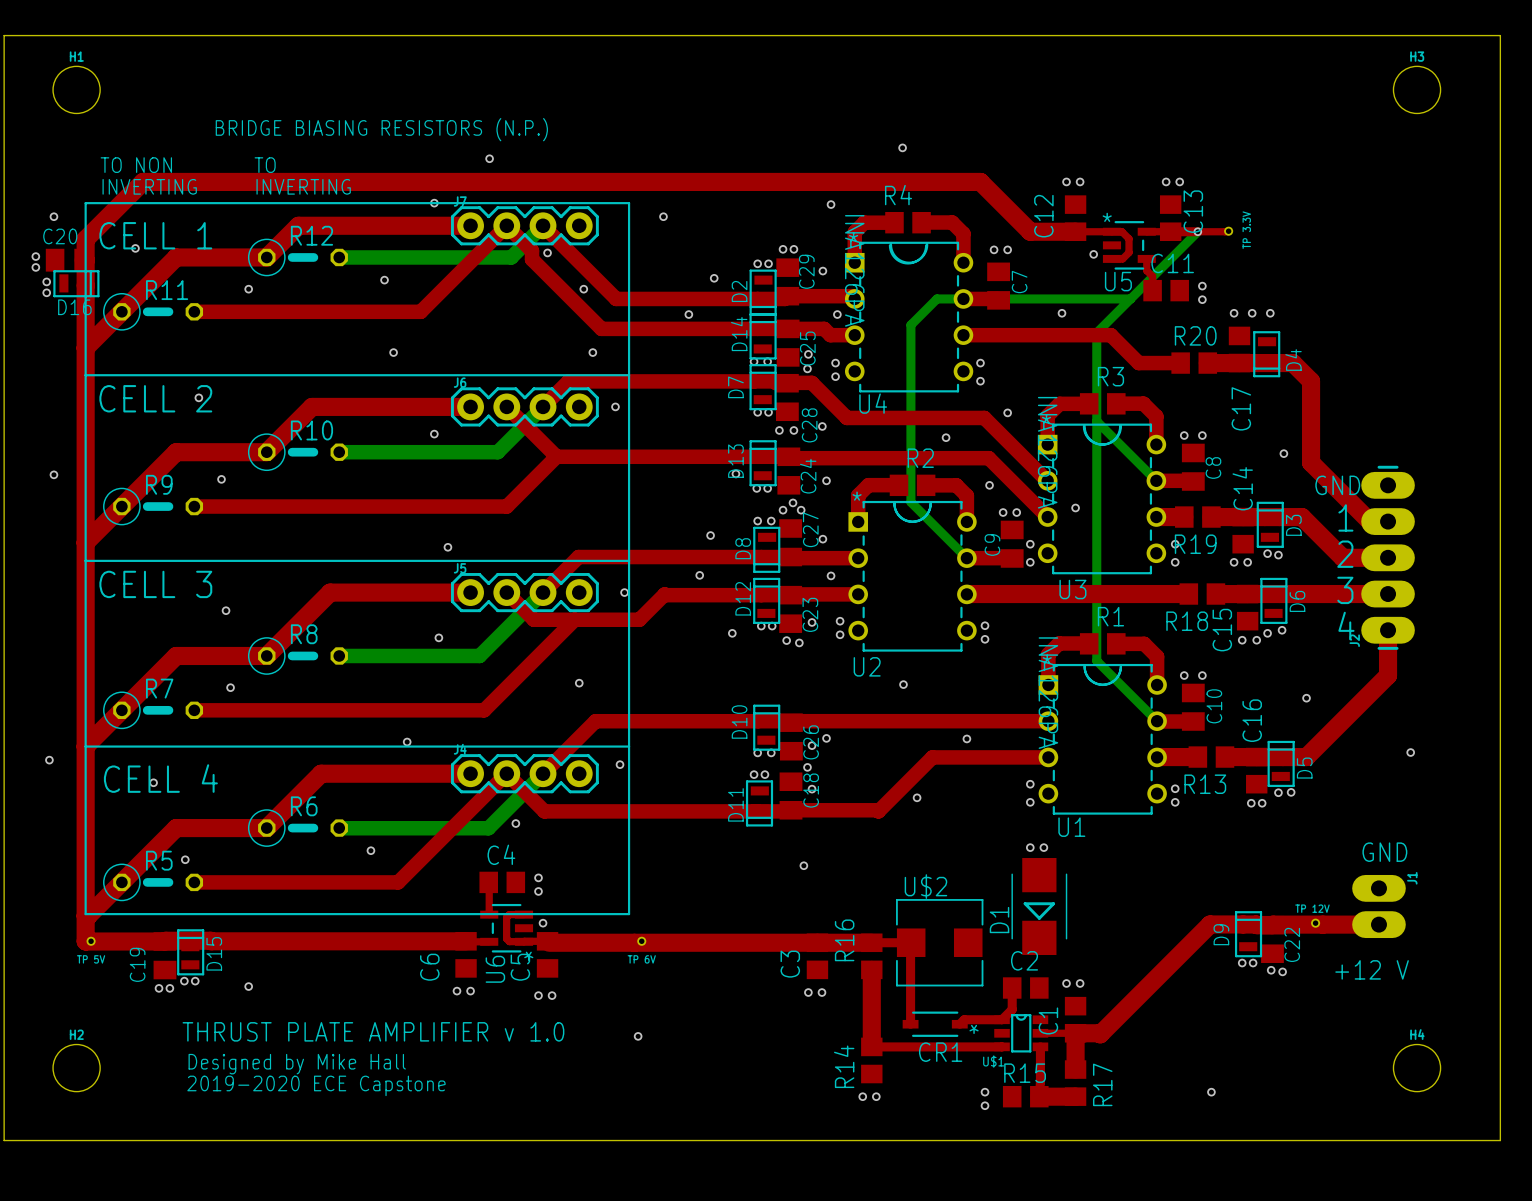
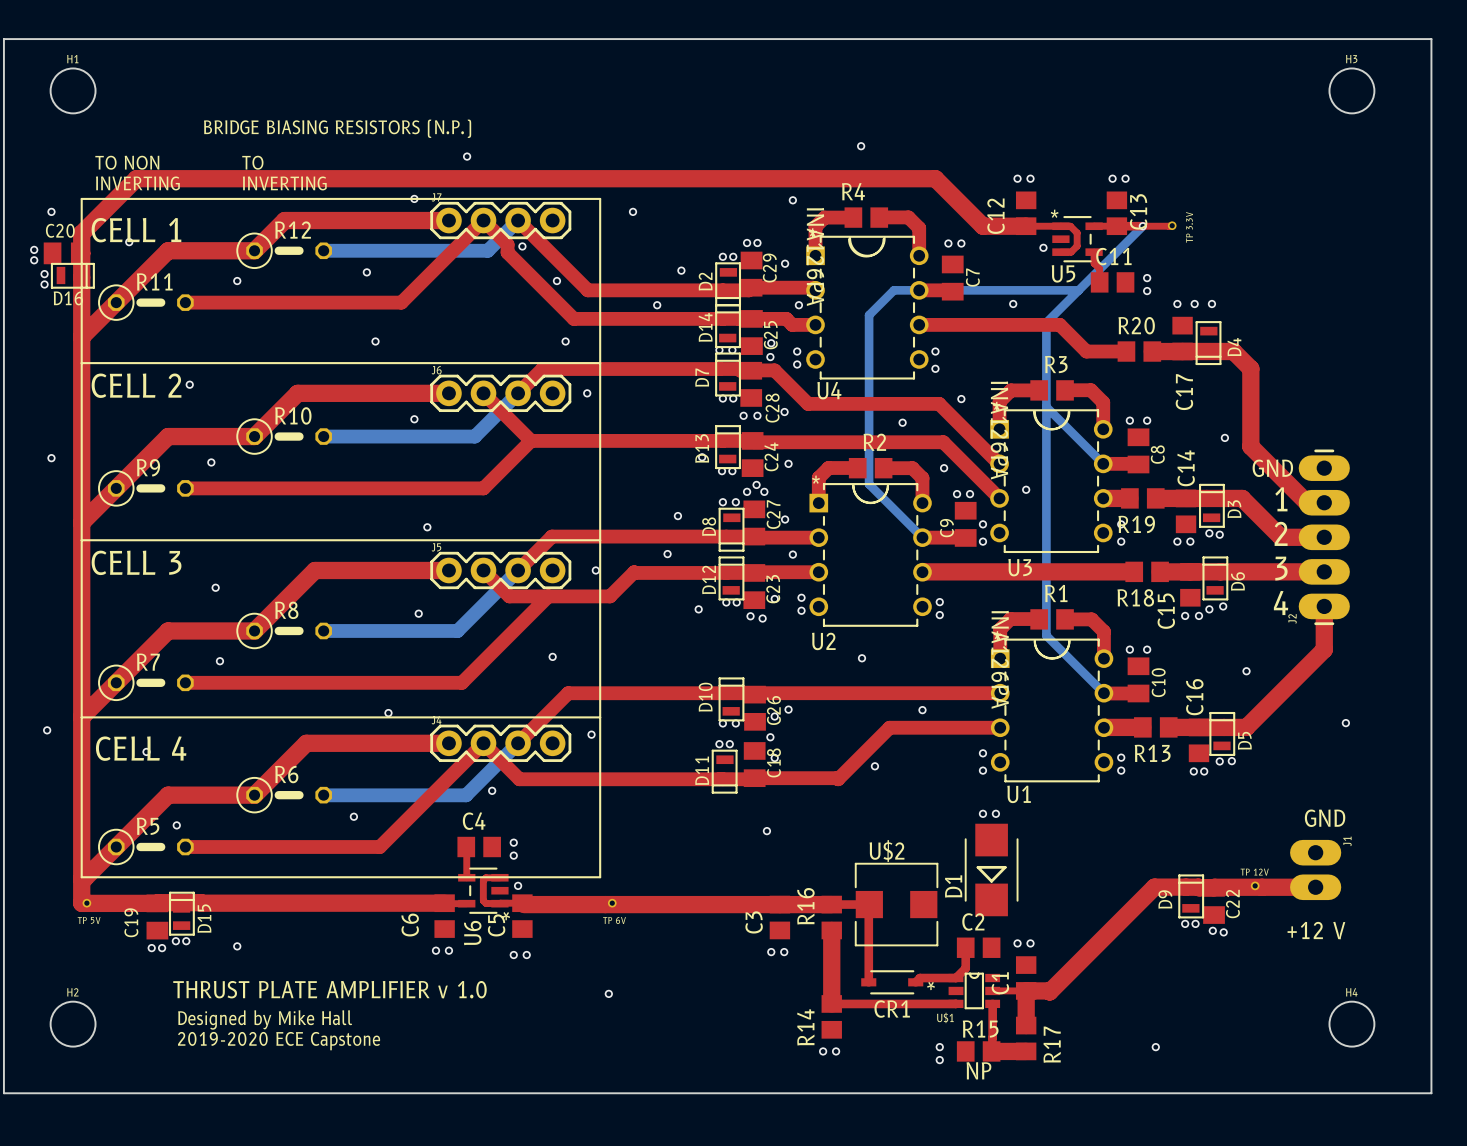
text: none -> NP (978, 1070)

